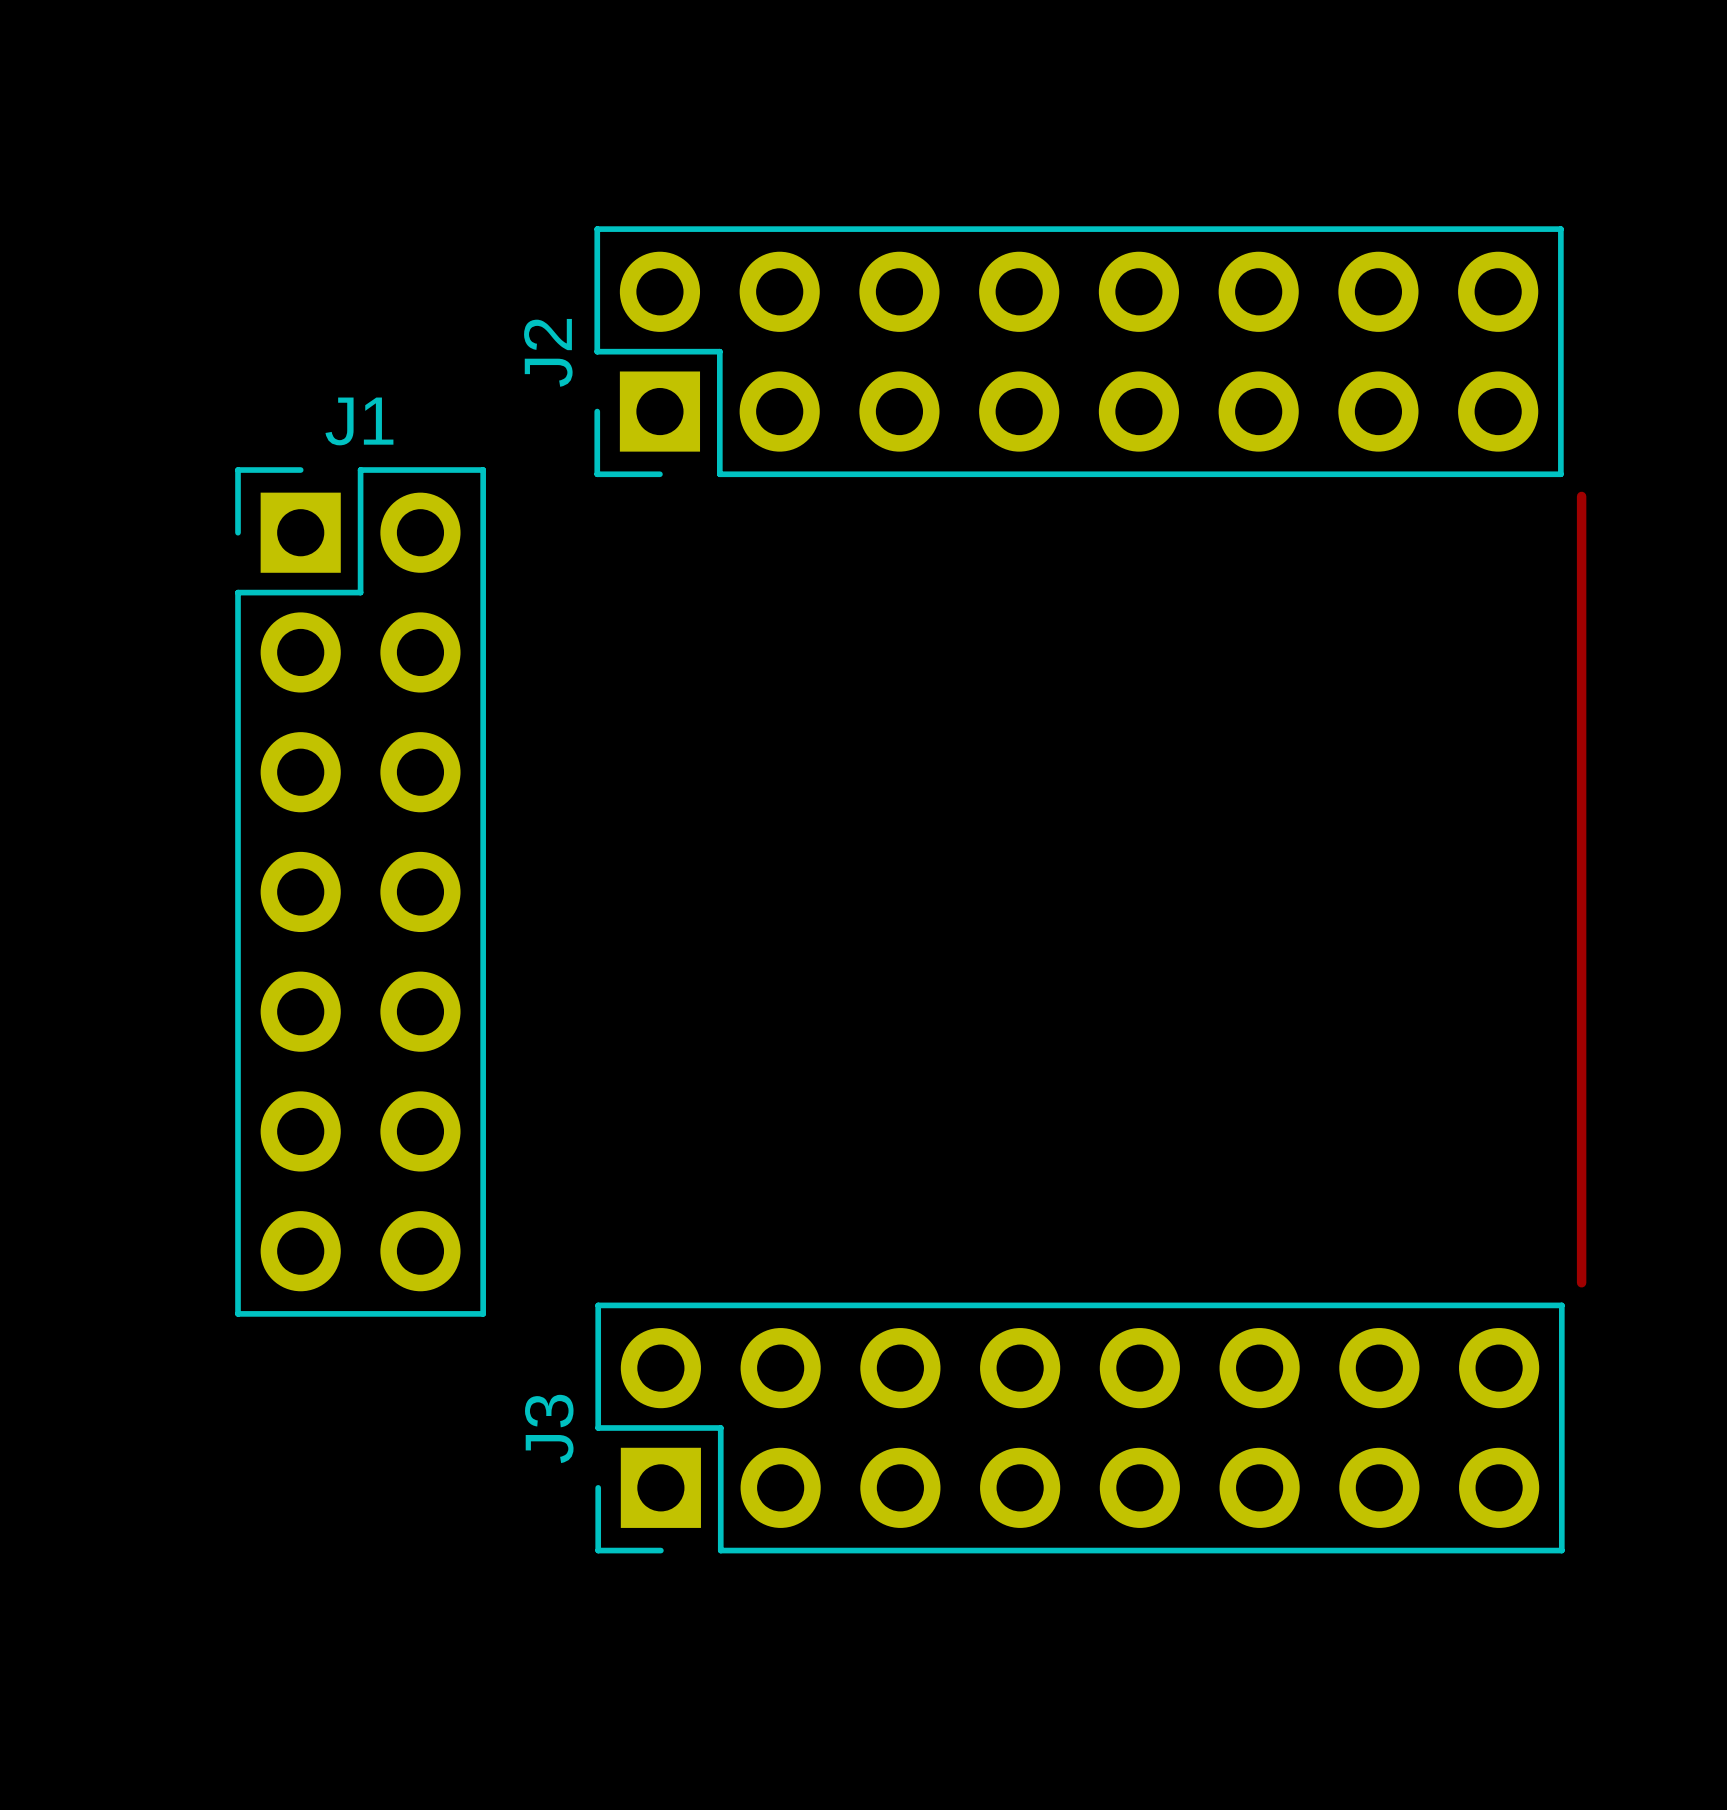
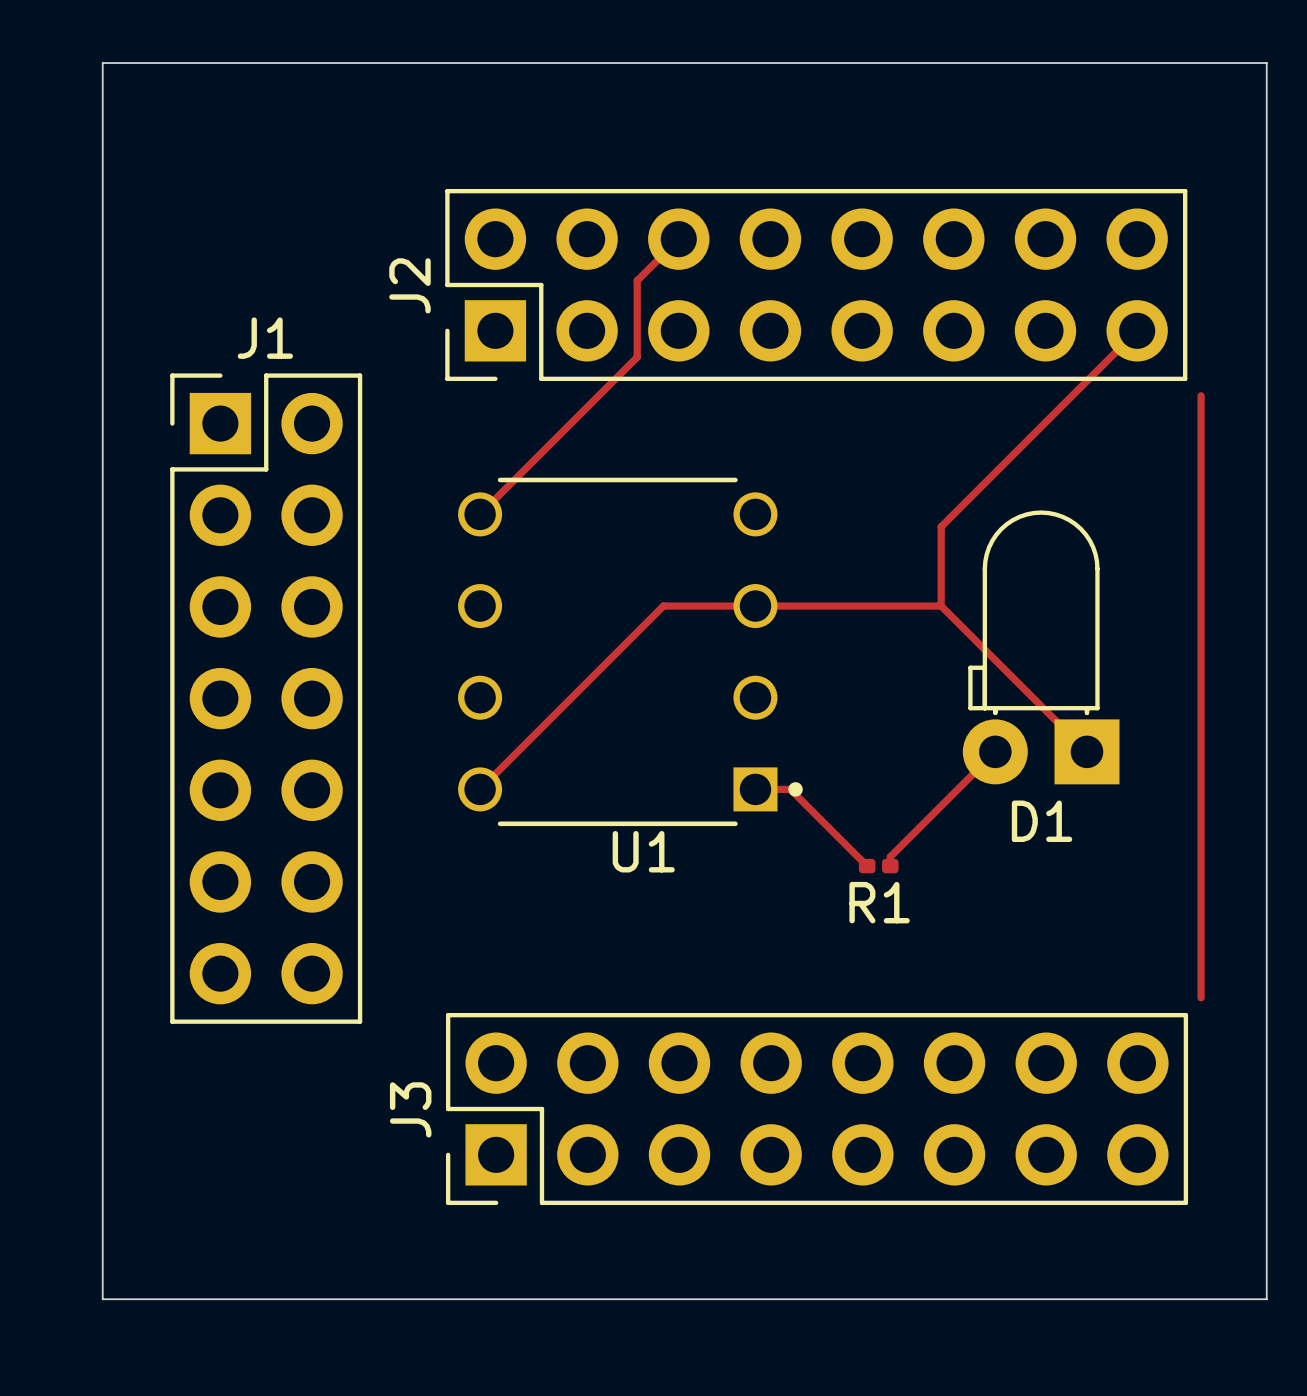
board edge: none -> (102, 63) (1266, 63) (1266, 1299) (102, 1299) (102, 63)
top track: none -> (678, 239) (637, 280) (637, 357) (480, 514)
top track: none -> (1137, 330) (941, 526) (941, 606)
top track: none -> (941, 606) (663, 606) (480, 789)
top track: none -> (941, 606) (1086, 751)
D1: none -> (1041, 647)
U1: none -> (630, 651)
top track: none -> (995, 751) (890, 856) (890, 866)
top track: none -> (755, 789) (790, 789) (867, 866)
R1: none -> (878, 866)

